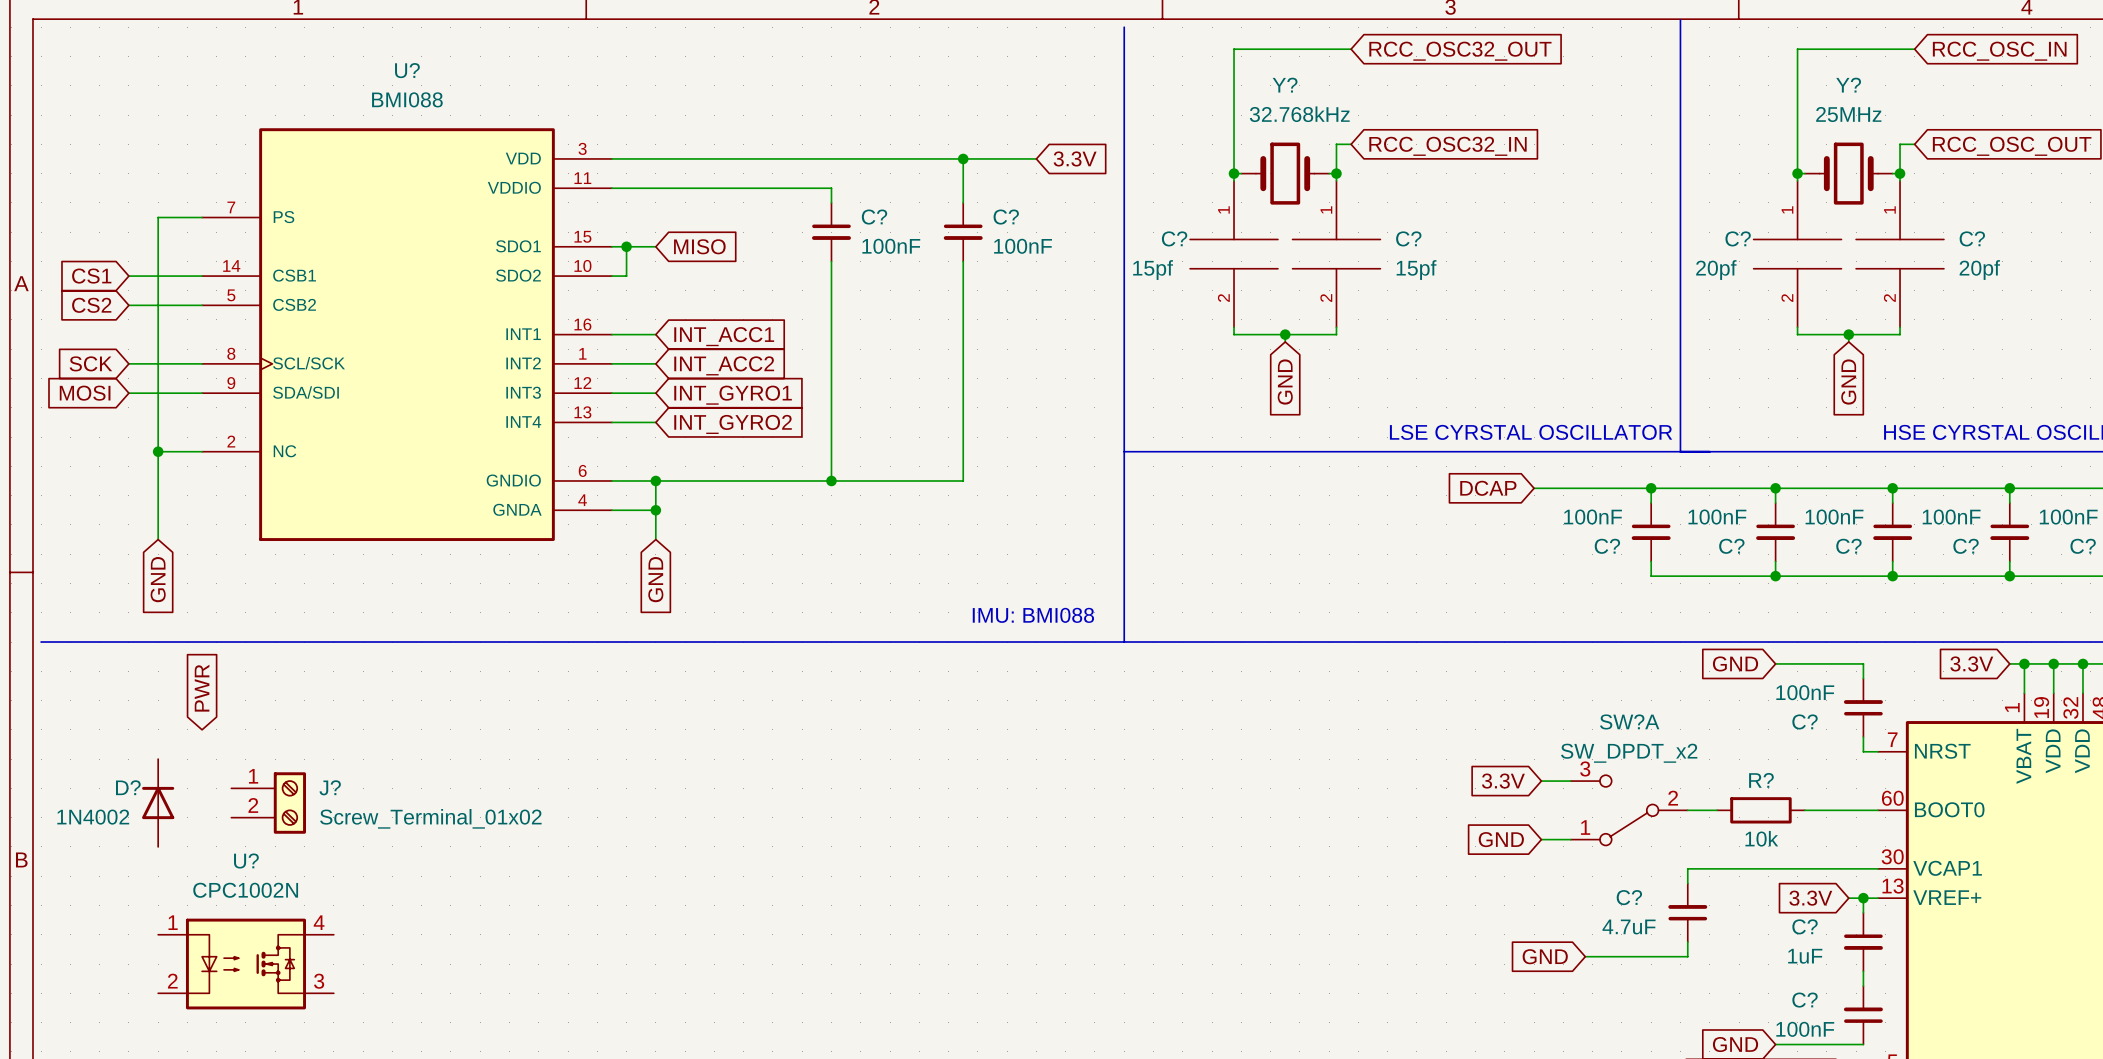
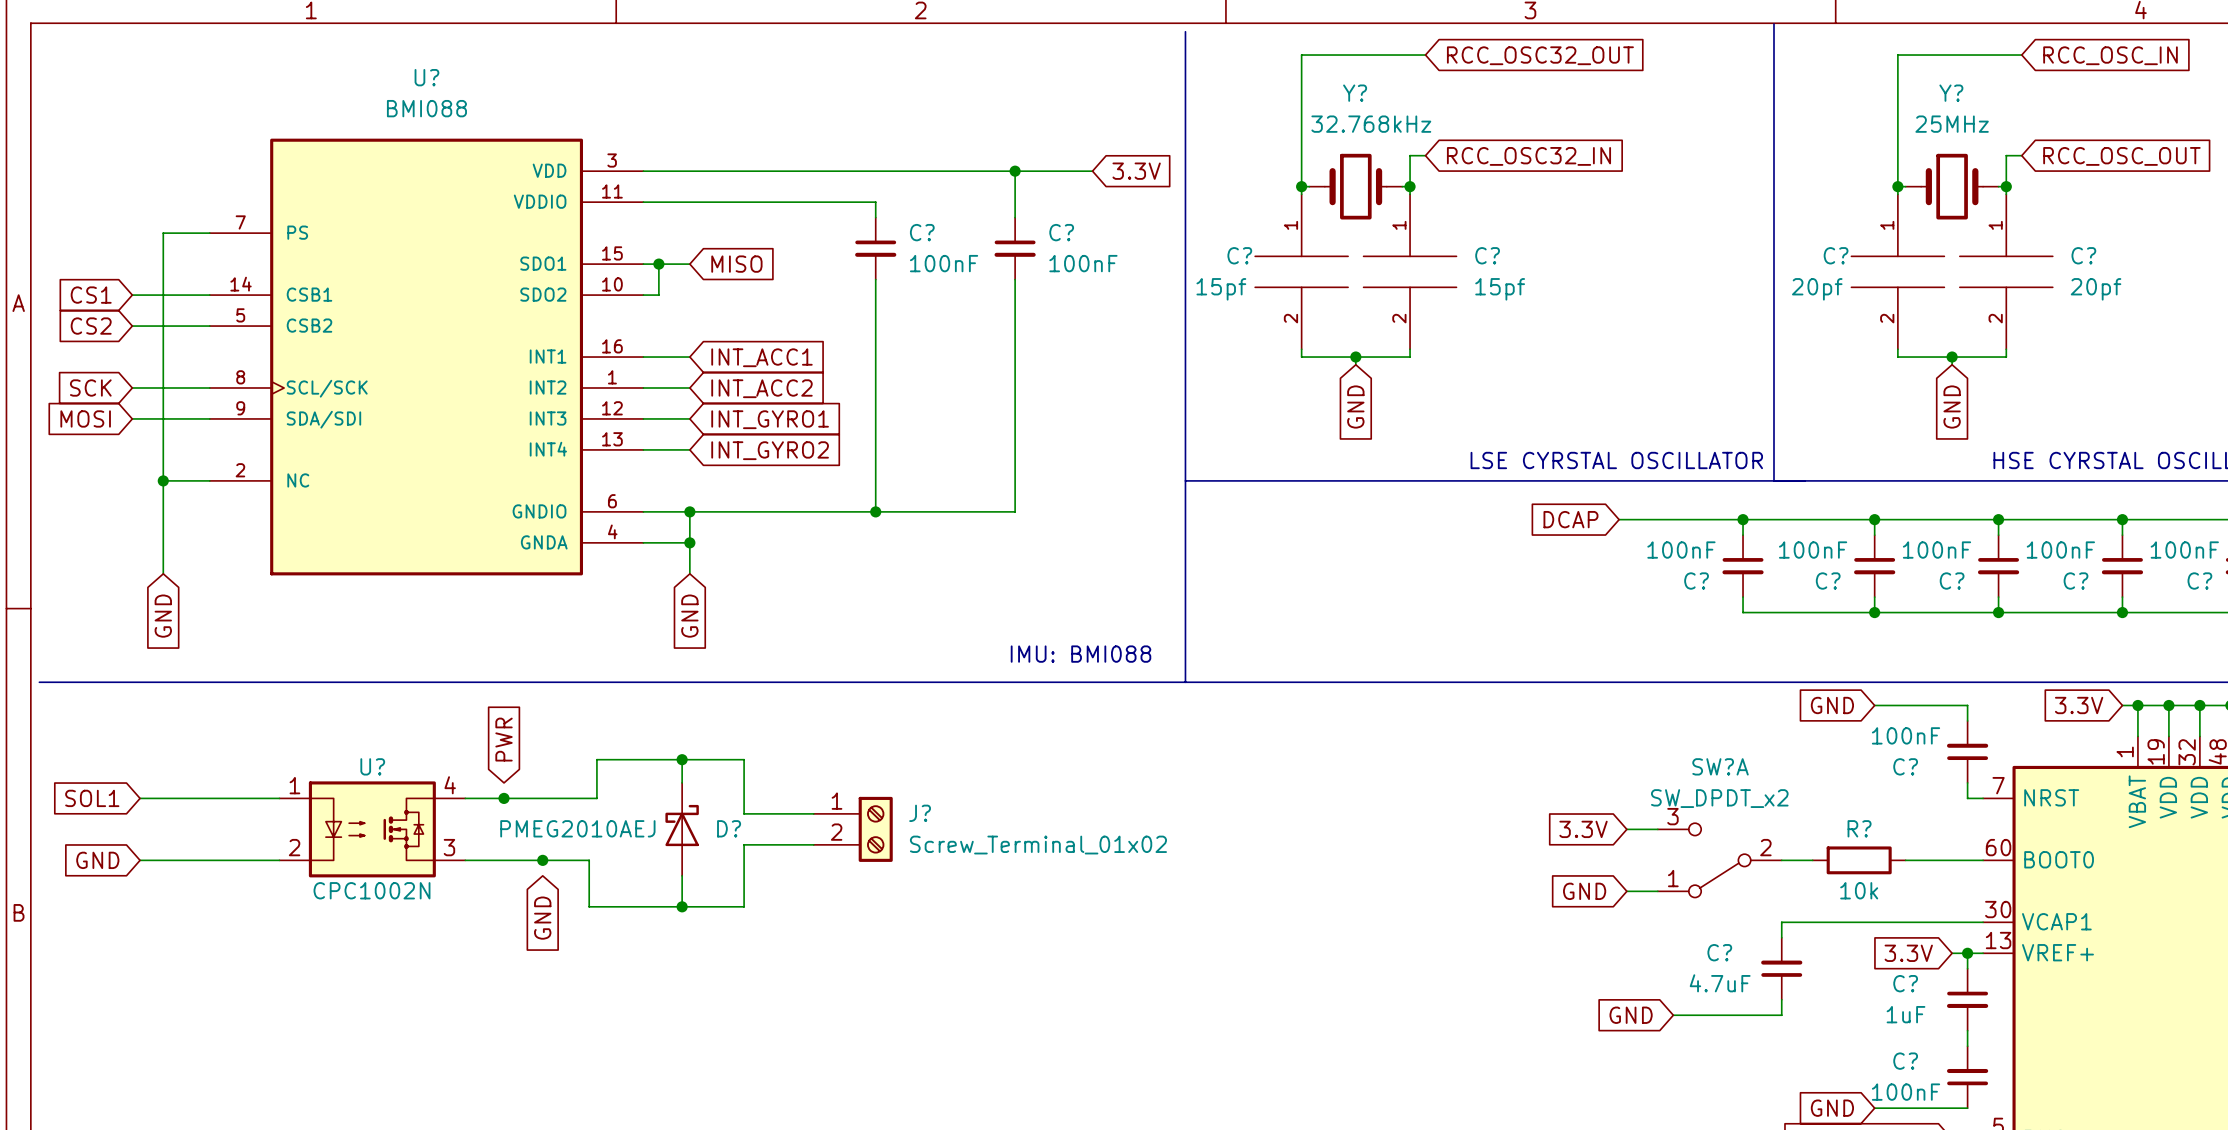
global label position: PWR (202, 688) -> PWR (504, 739)
wire: none -> (682, 759) (682, 782)
junction: none -> (682, 759)
global label: none -> SOL1 (92, 798)
wire: none -> (140, 798) (279, 798)
wire: none -> (465, 798) (596, 798) (596, 759) (744, 759) (744, 813) (813, 813)
junction: none -> (504, 798)
D?: none -> PMEG2010AEJ (682, 829)
J?: none -> Screw_Terminal_01x02 (853, 829)
wire: none -> (813, 844) (744, 844) (744, 906) (589, 906) (589, 860) (465, 860)
D?: 1N4002 (158, 803) -> none
J?: Screw_Terminal_01x02 (268, 803) -> none
global label: none -> GND (97, 860)
wire: none -> (140, 860) (279, 860)
junction: none -> (542, 860)
wire: none -> (682, 875) (682, 906)
junction: none -> (682, 906)
U? name position: U? (246, 861) -> U? (372, 766)
global label: none -> GND (542, 918)
U? value position: CPC1002N (245, 890) -> CPC1002N (372, 890)
U? position: (245, 964) -> (372, 829)

